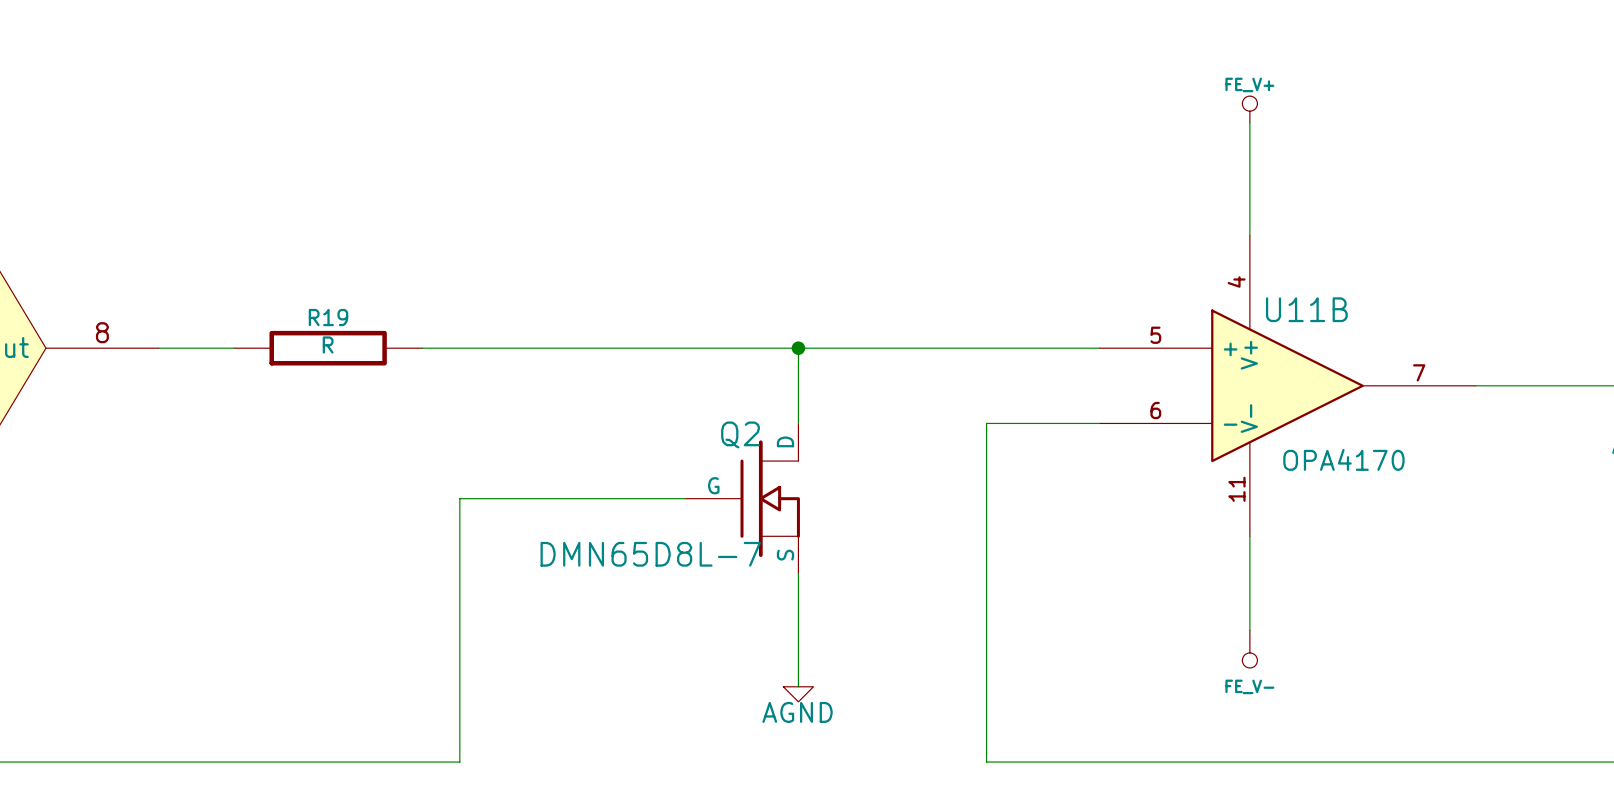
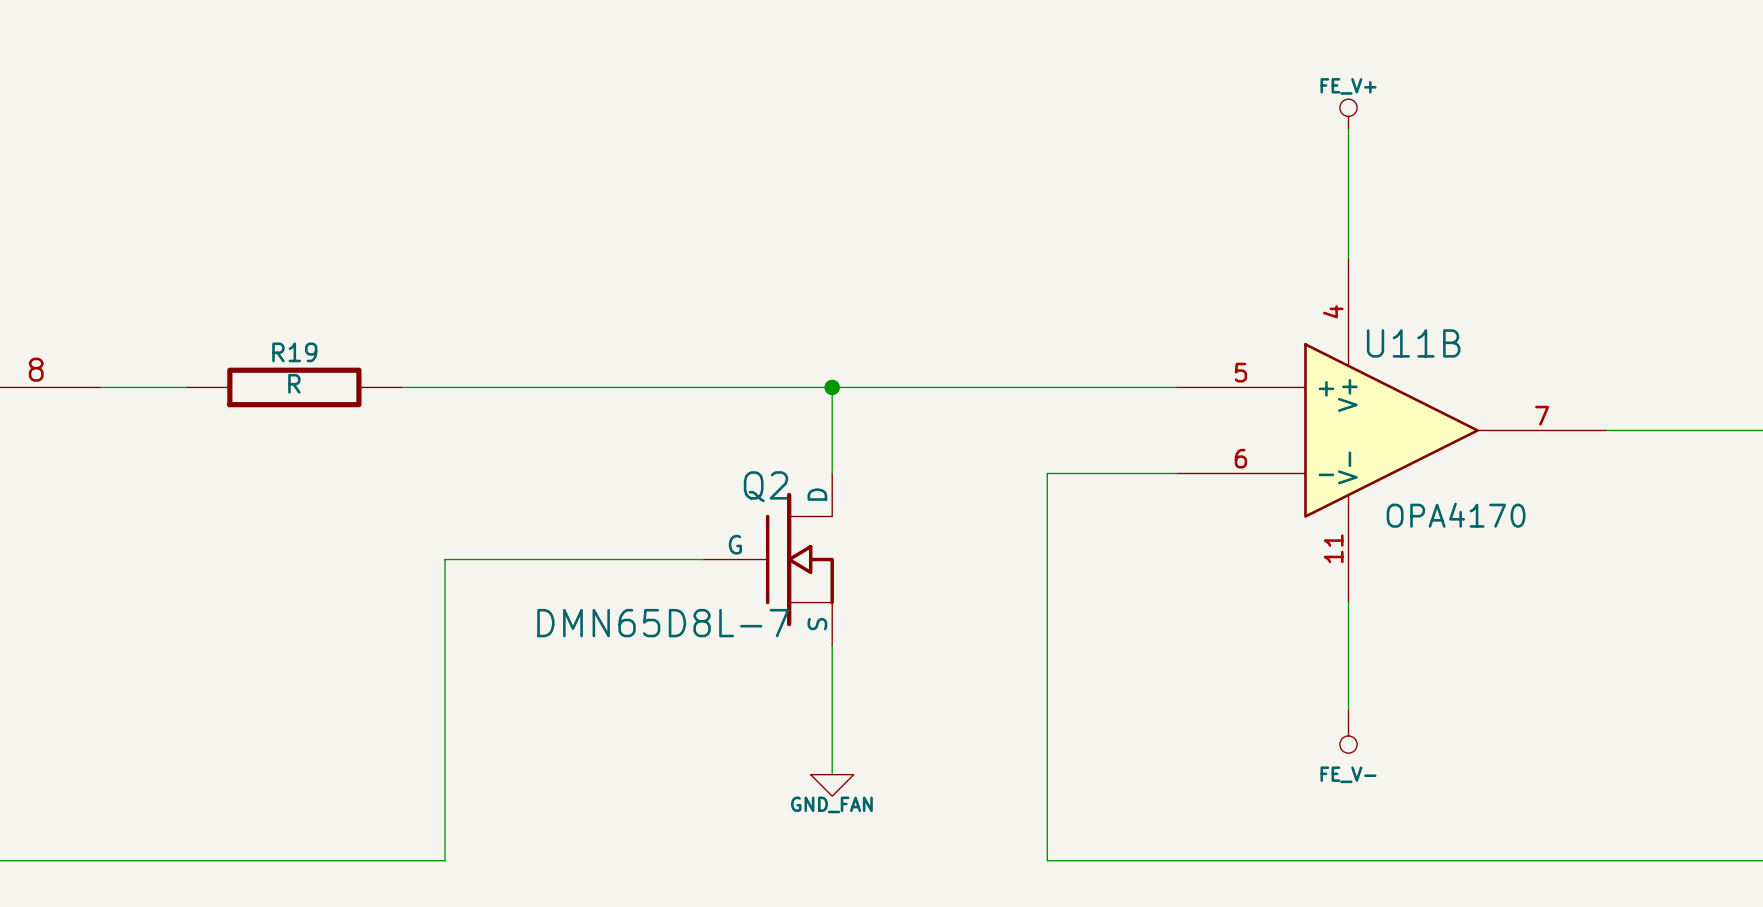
power symbol: AGND (798, 694) -> GND_FAN (832, 785)

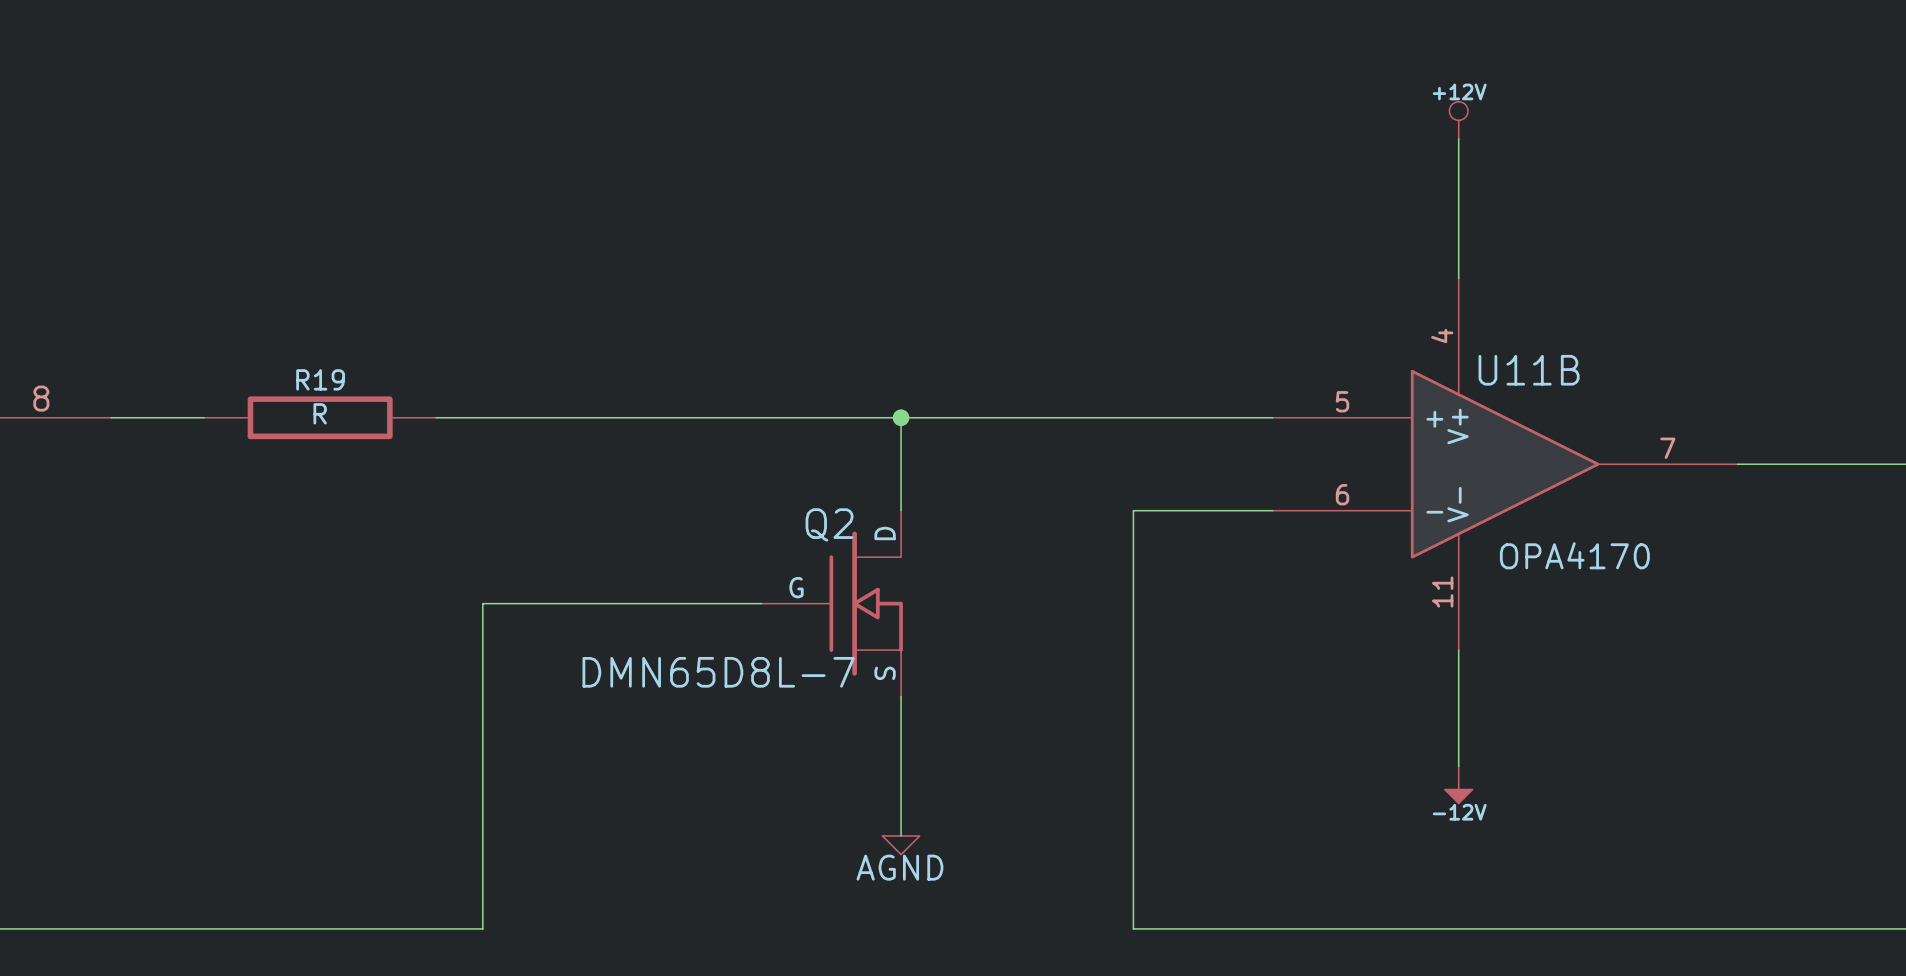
power symbol: FE_V+ (1348, 114) -> +12V (1458, 120)
power symbol: FE_V- (1348, 731) -> -12V (1458, 784)
power symbol: GND_FAN (832, 785) -> AGND (901, 845)

